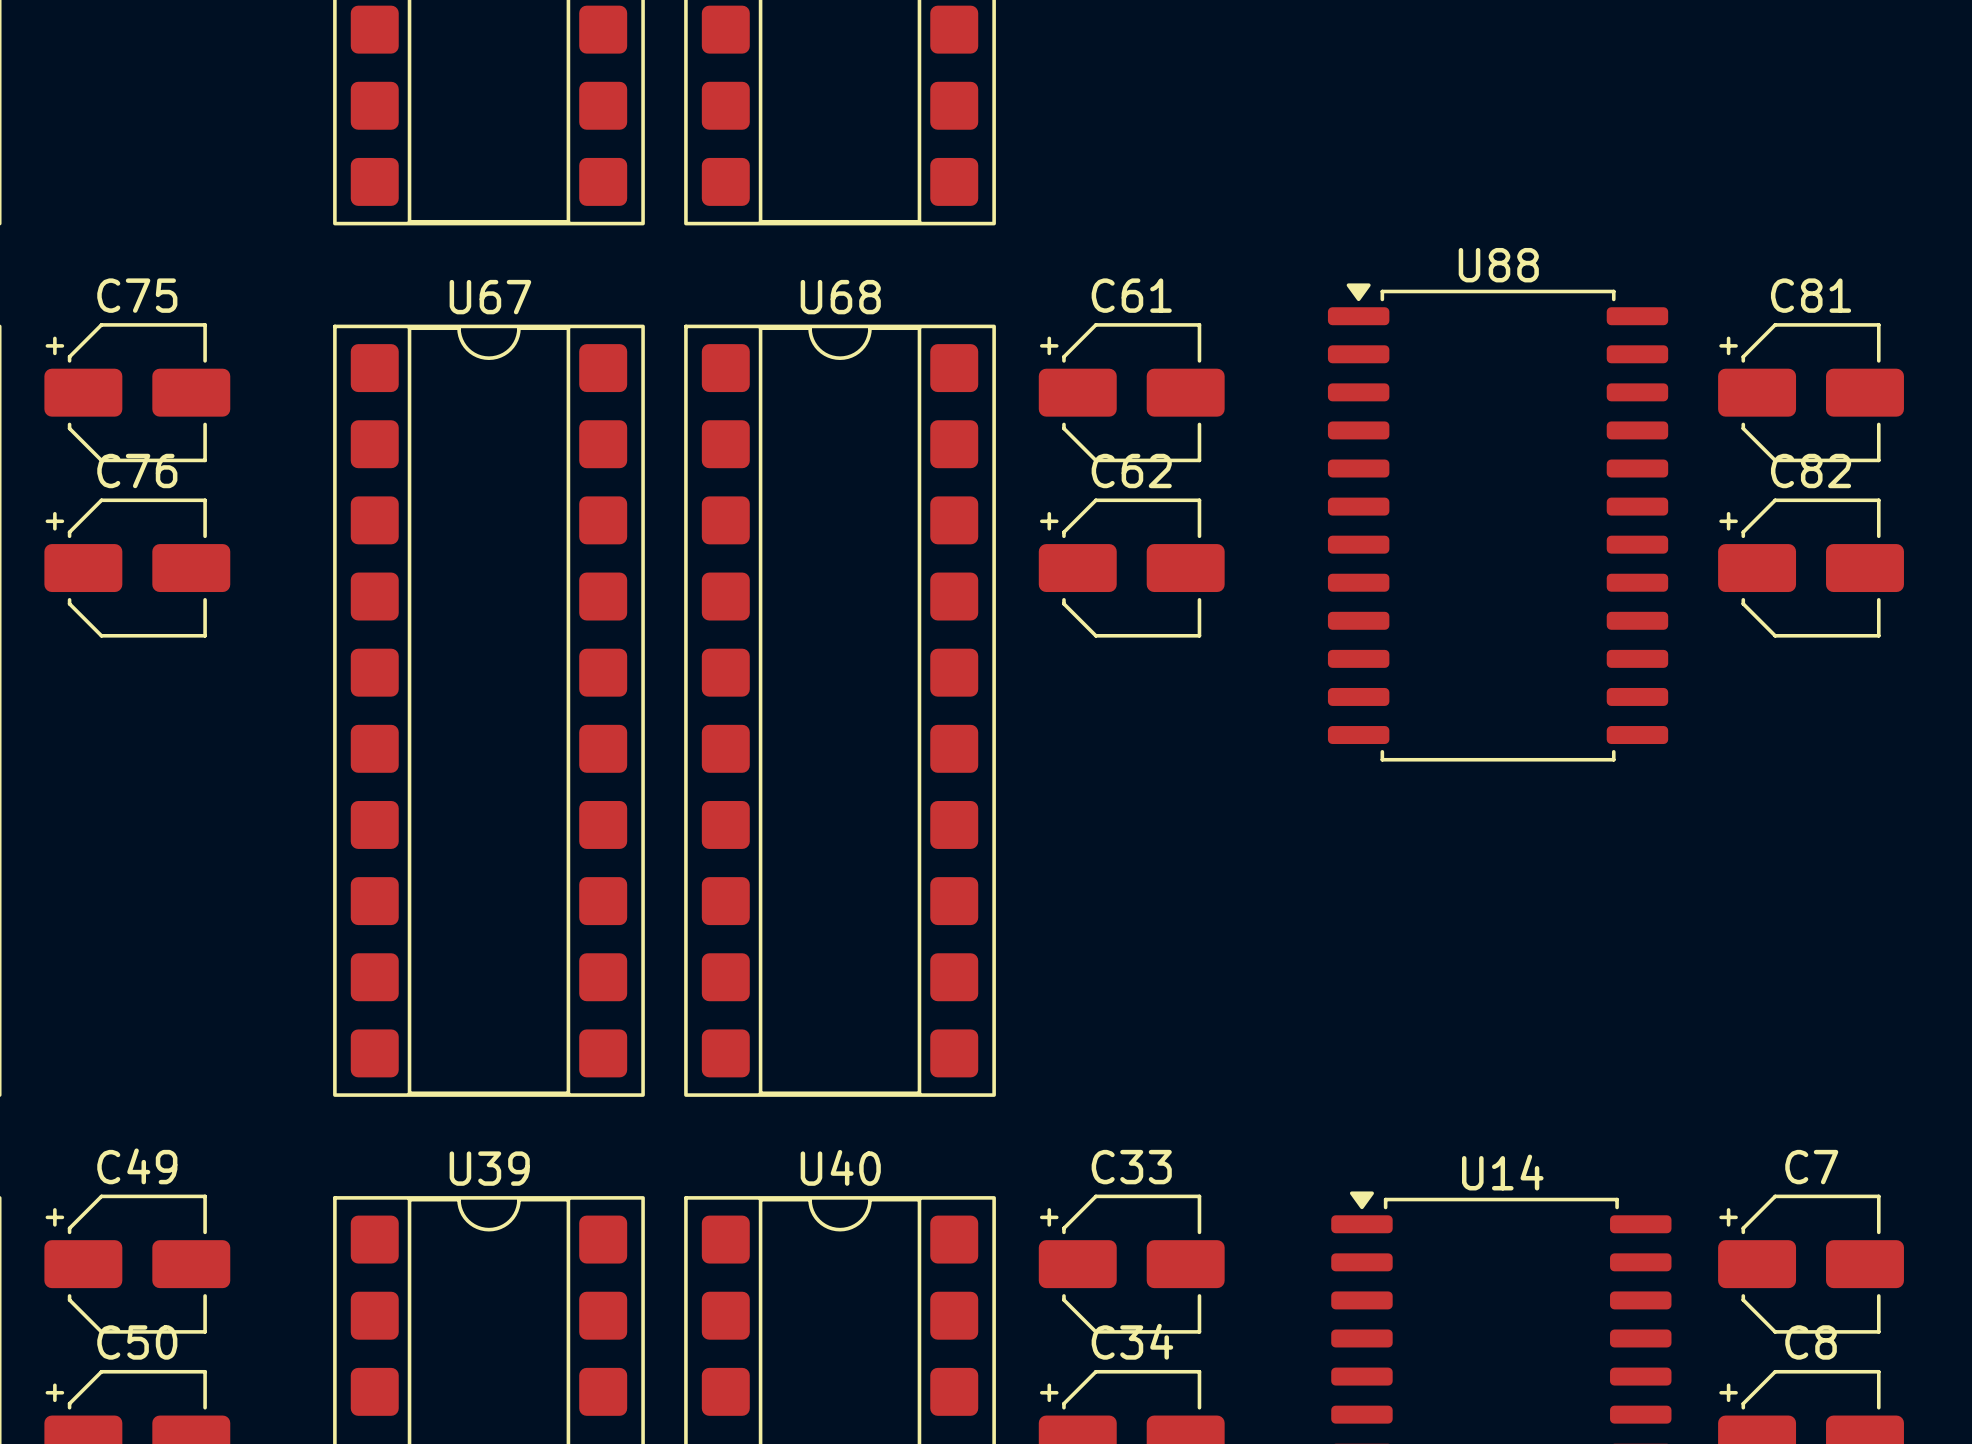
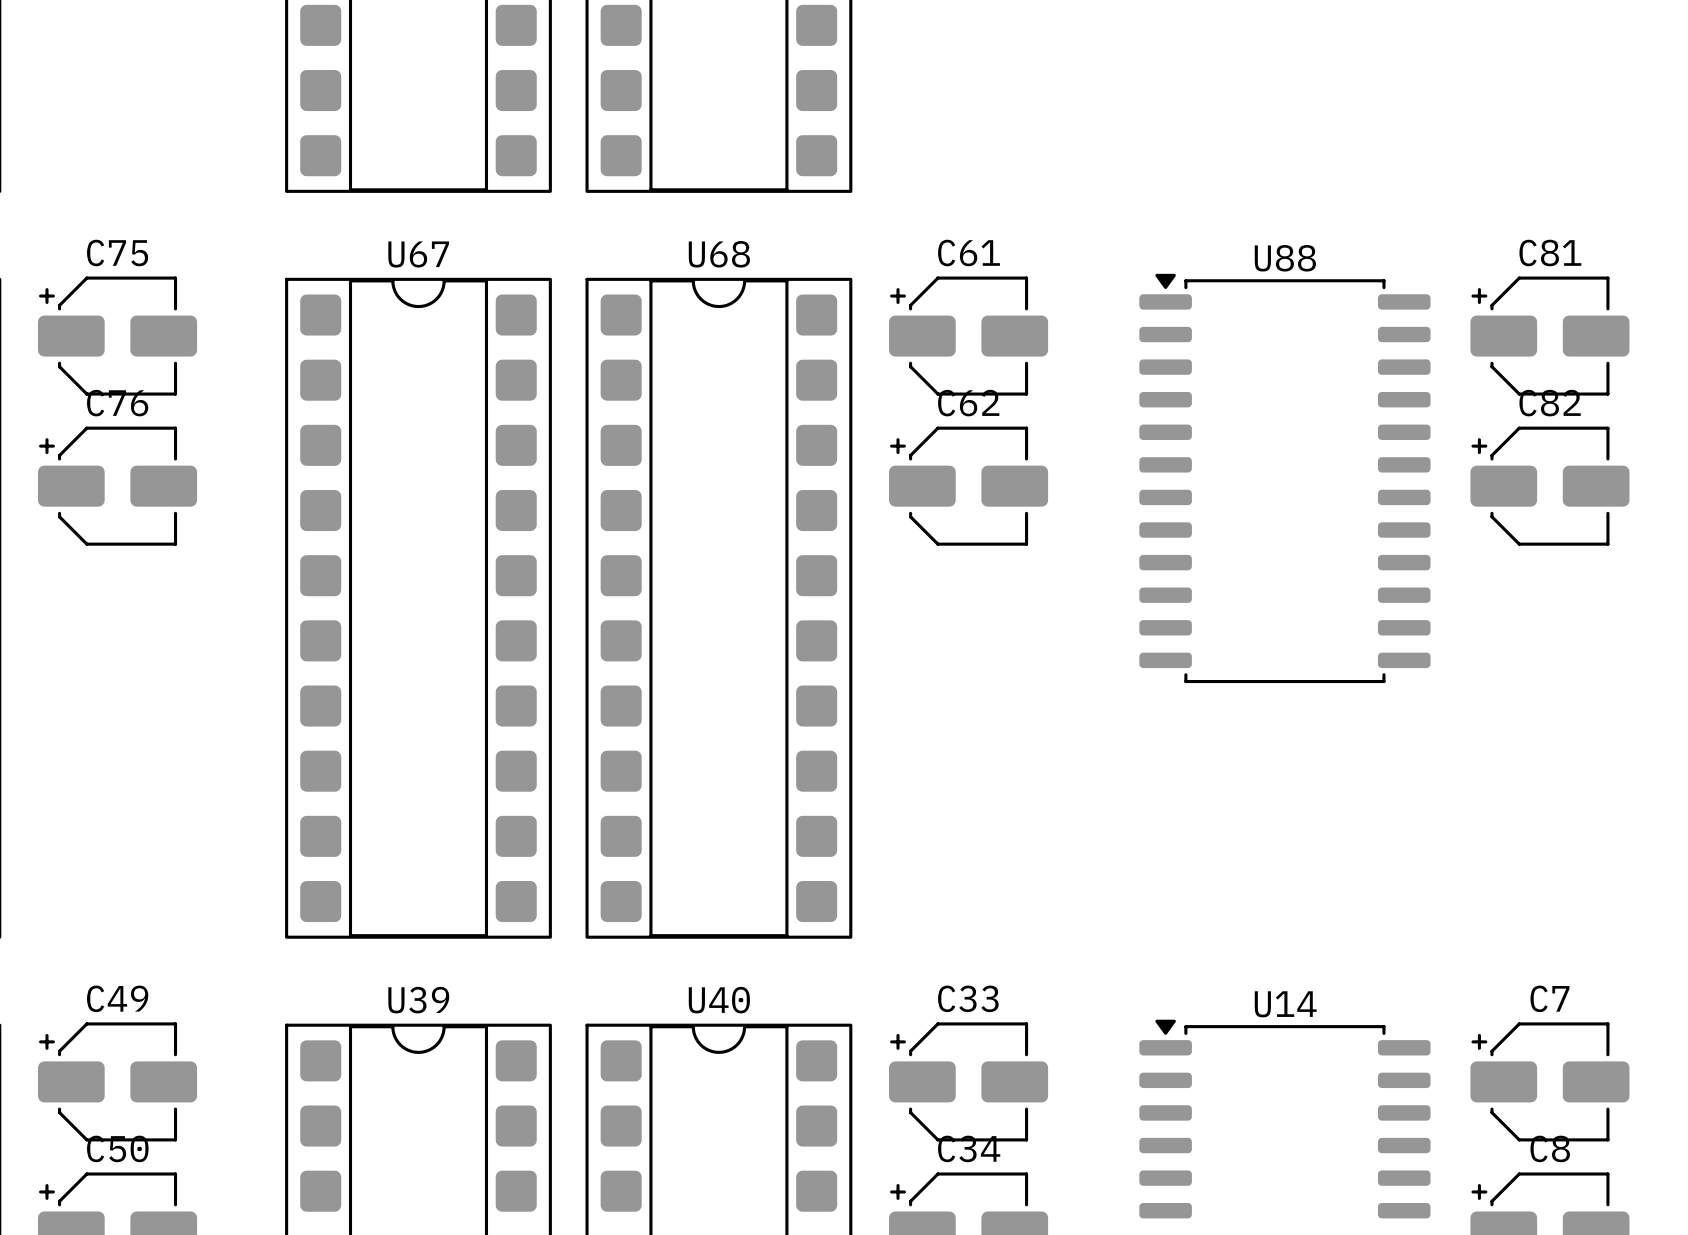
U88 position: (1498, 522) -> (1284, 478)

